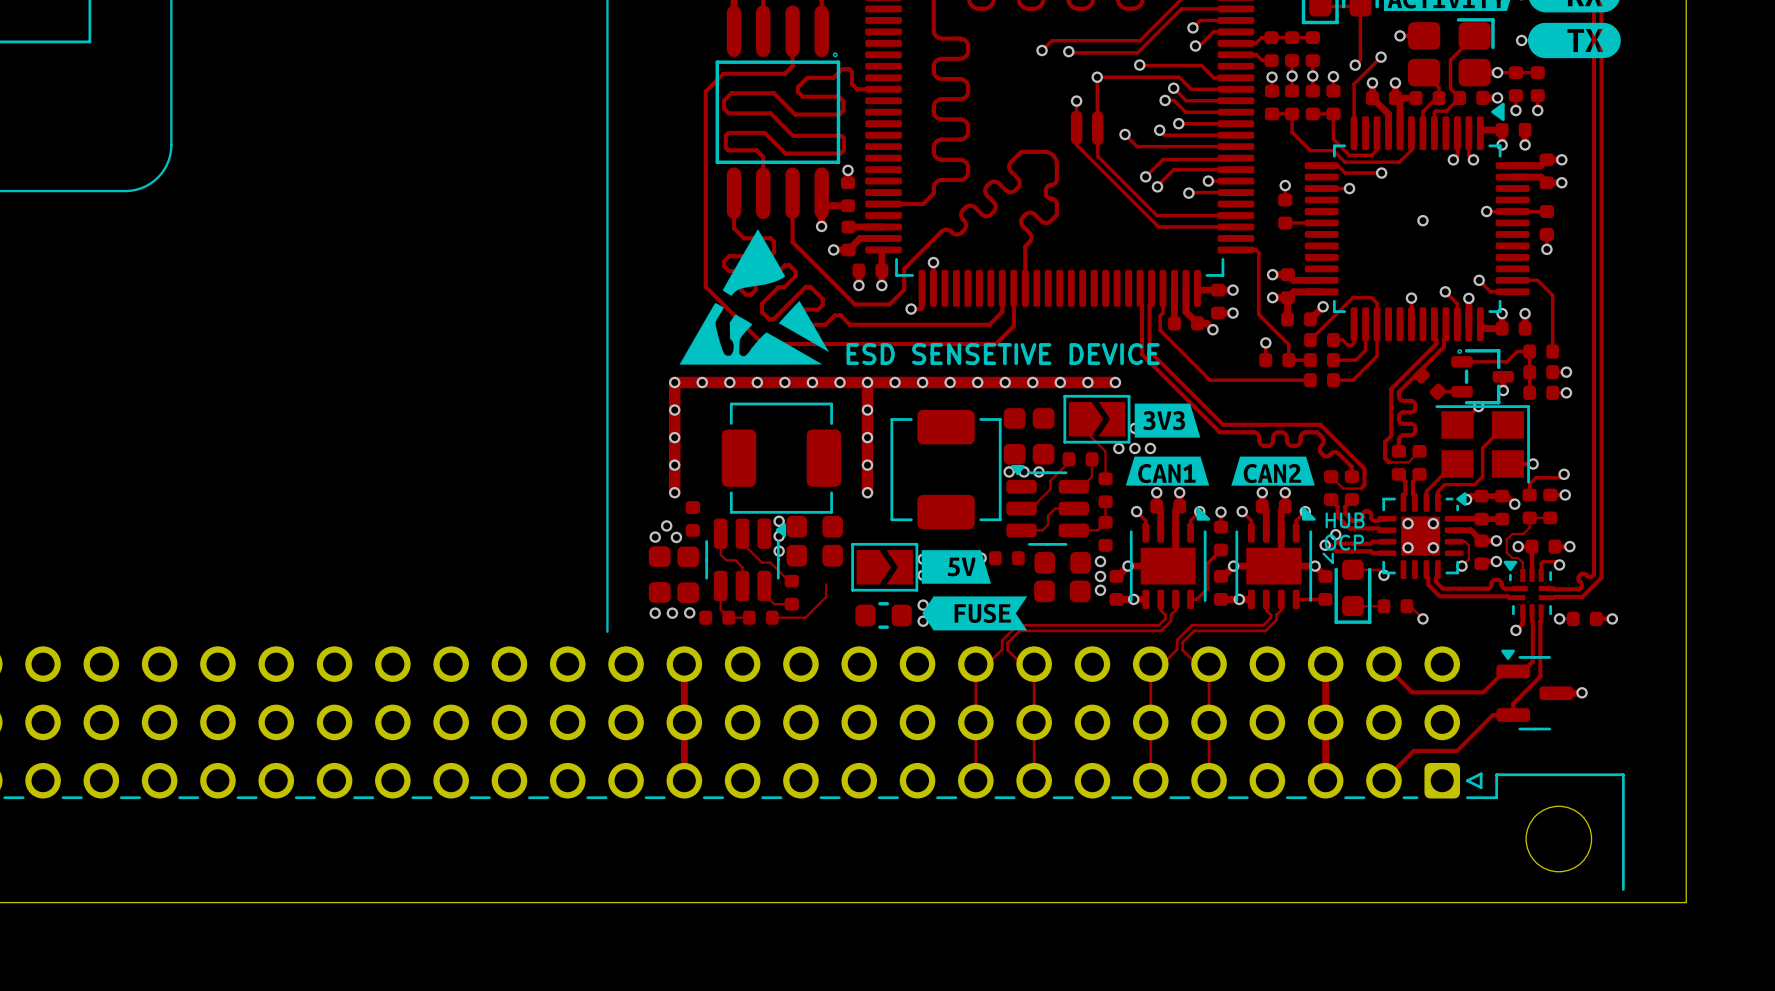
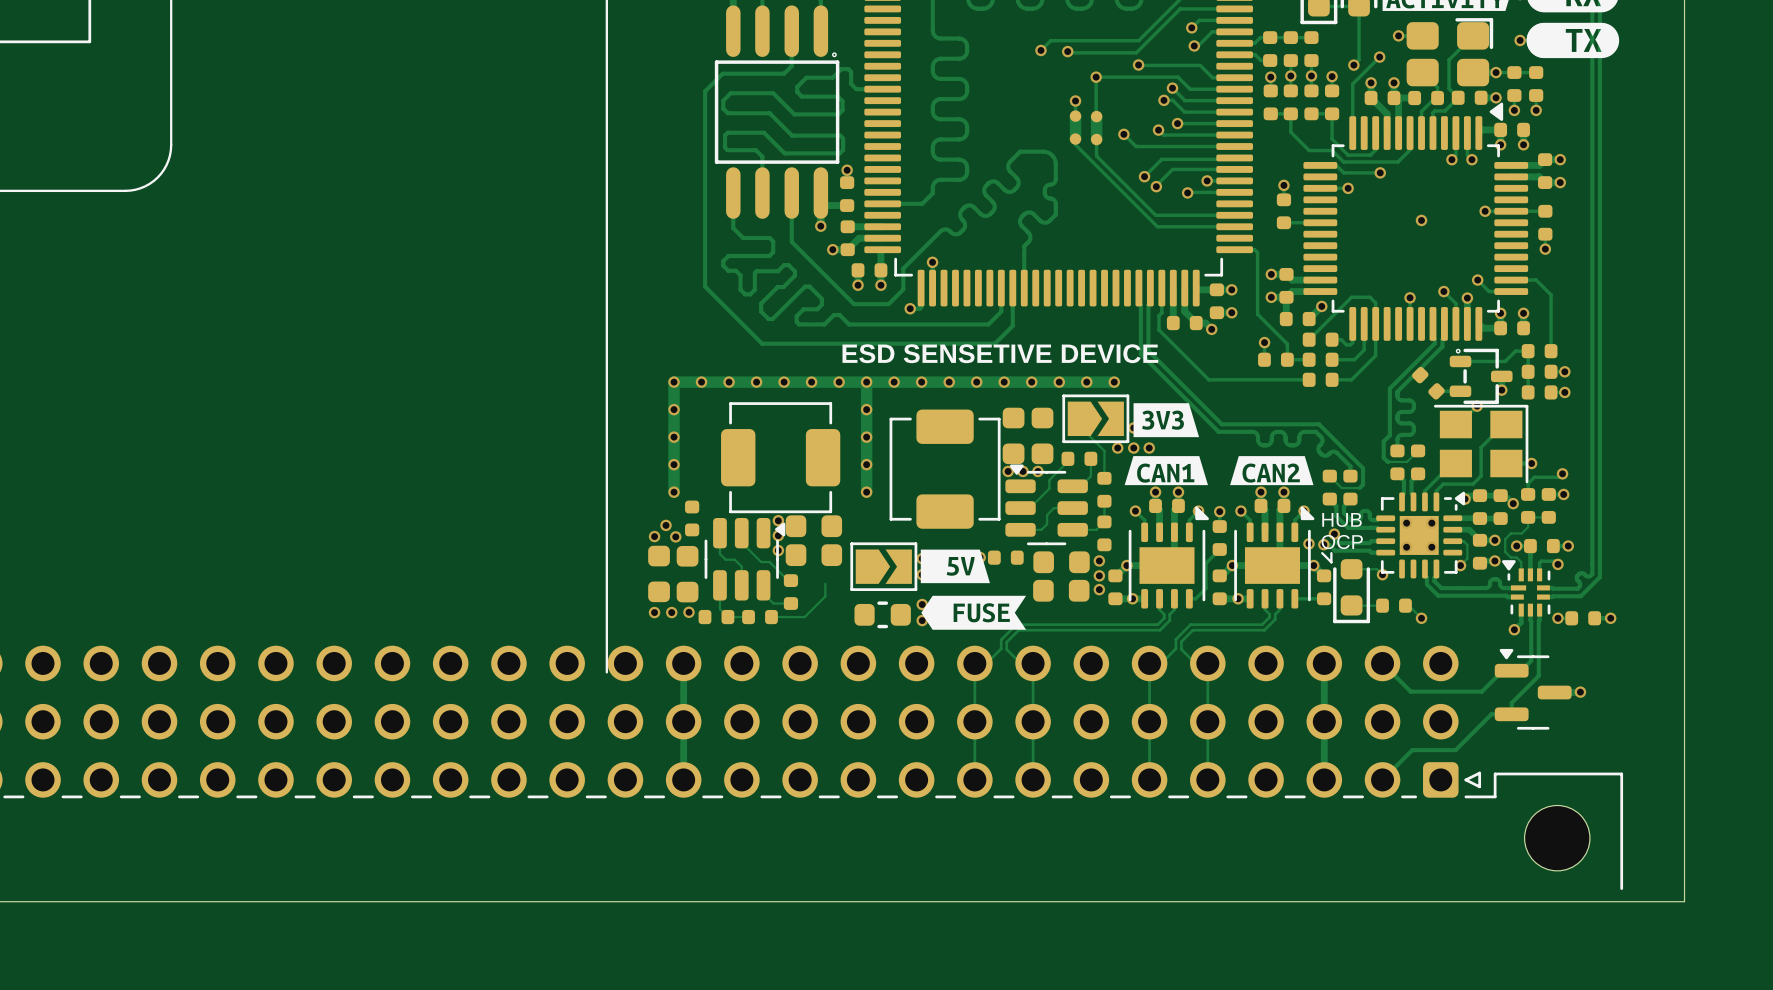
drawing: [679, 229, 829, 365] -> none
via: none -> (1308, 543)
line: none -> (606, 631) (606, 672)

